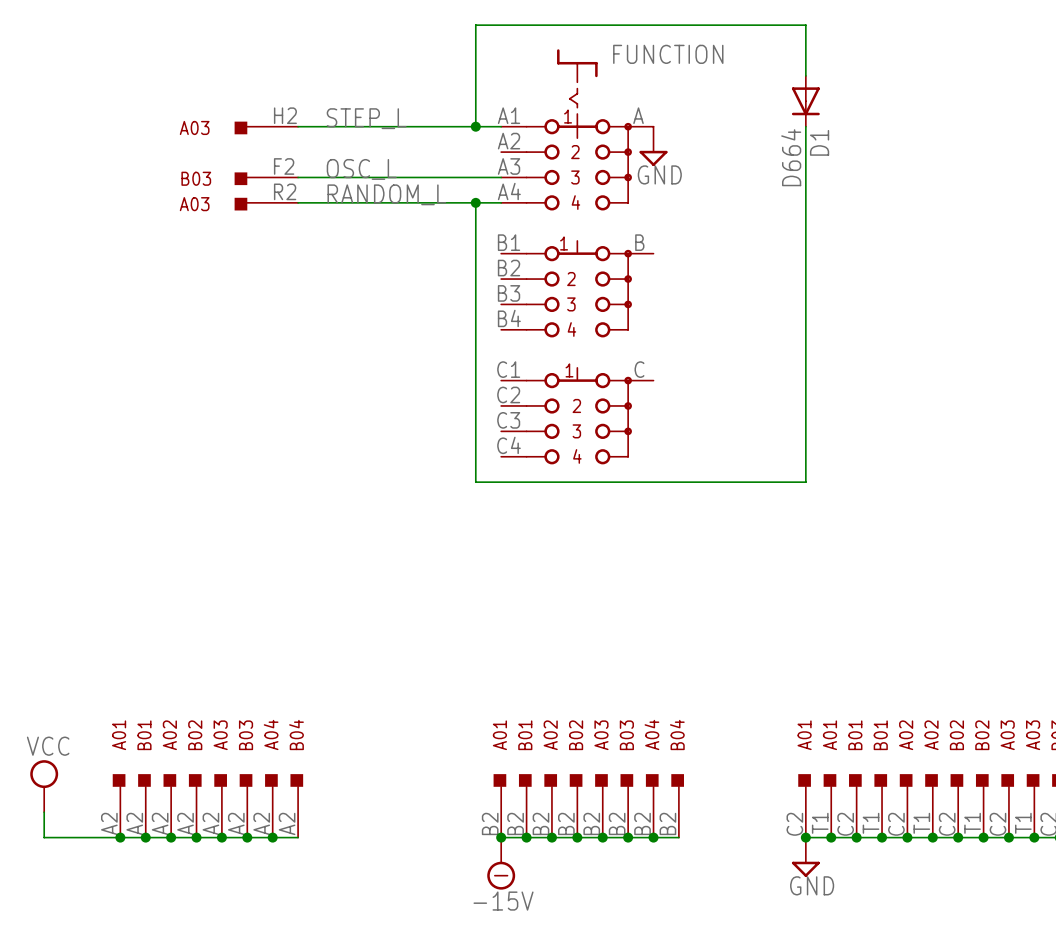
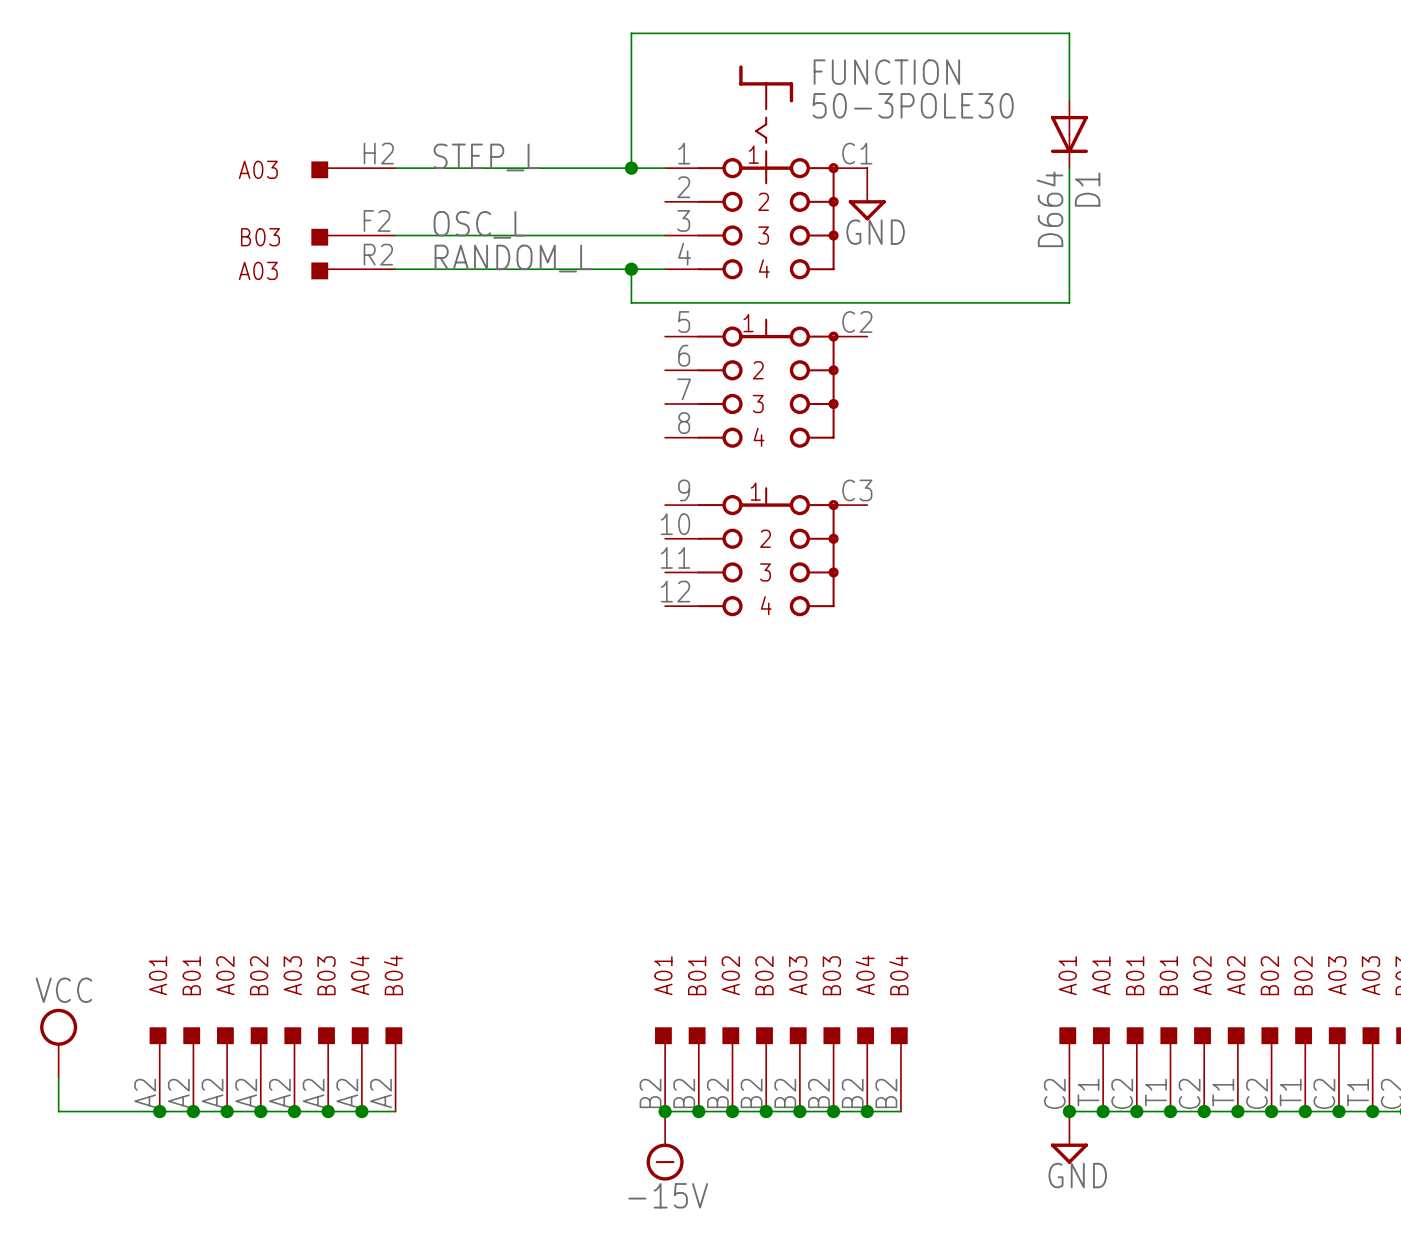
FUNCTION symbol: [501, 49, 654, 465] -> [665, 65, 868, 617]
FUNCTION value: none -> 50-3POLE30 (913, 105)
wire: (475, 228) (475, 482) (805, 482) (805, 228) -> (631, 302) (1069, 302)

